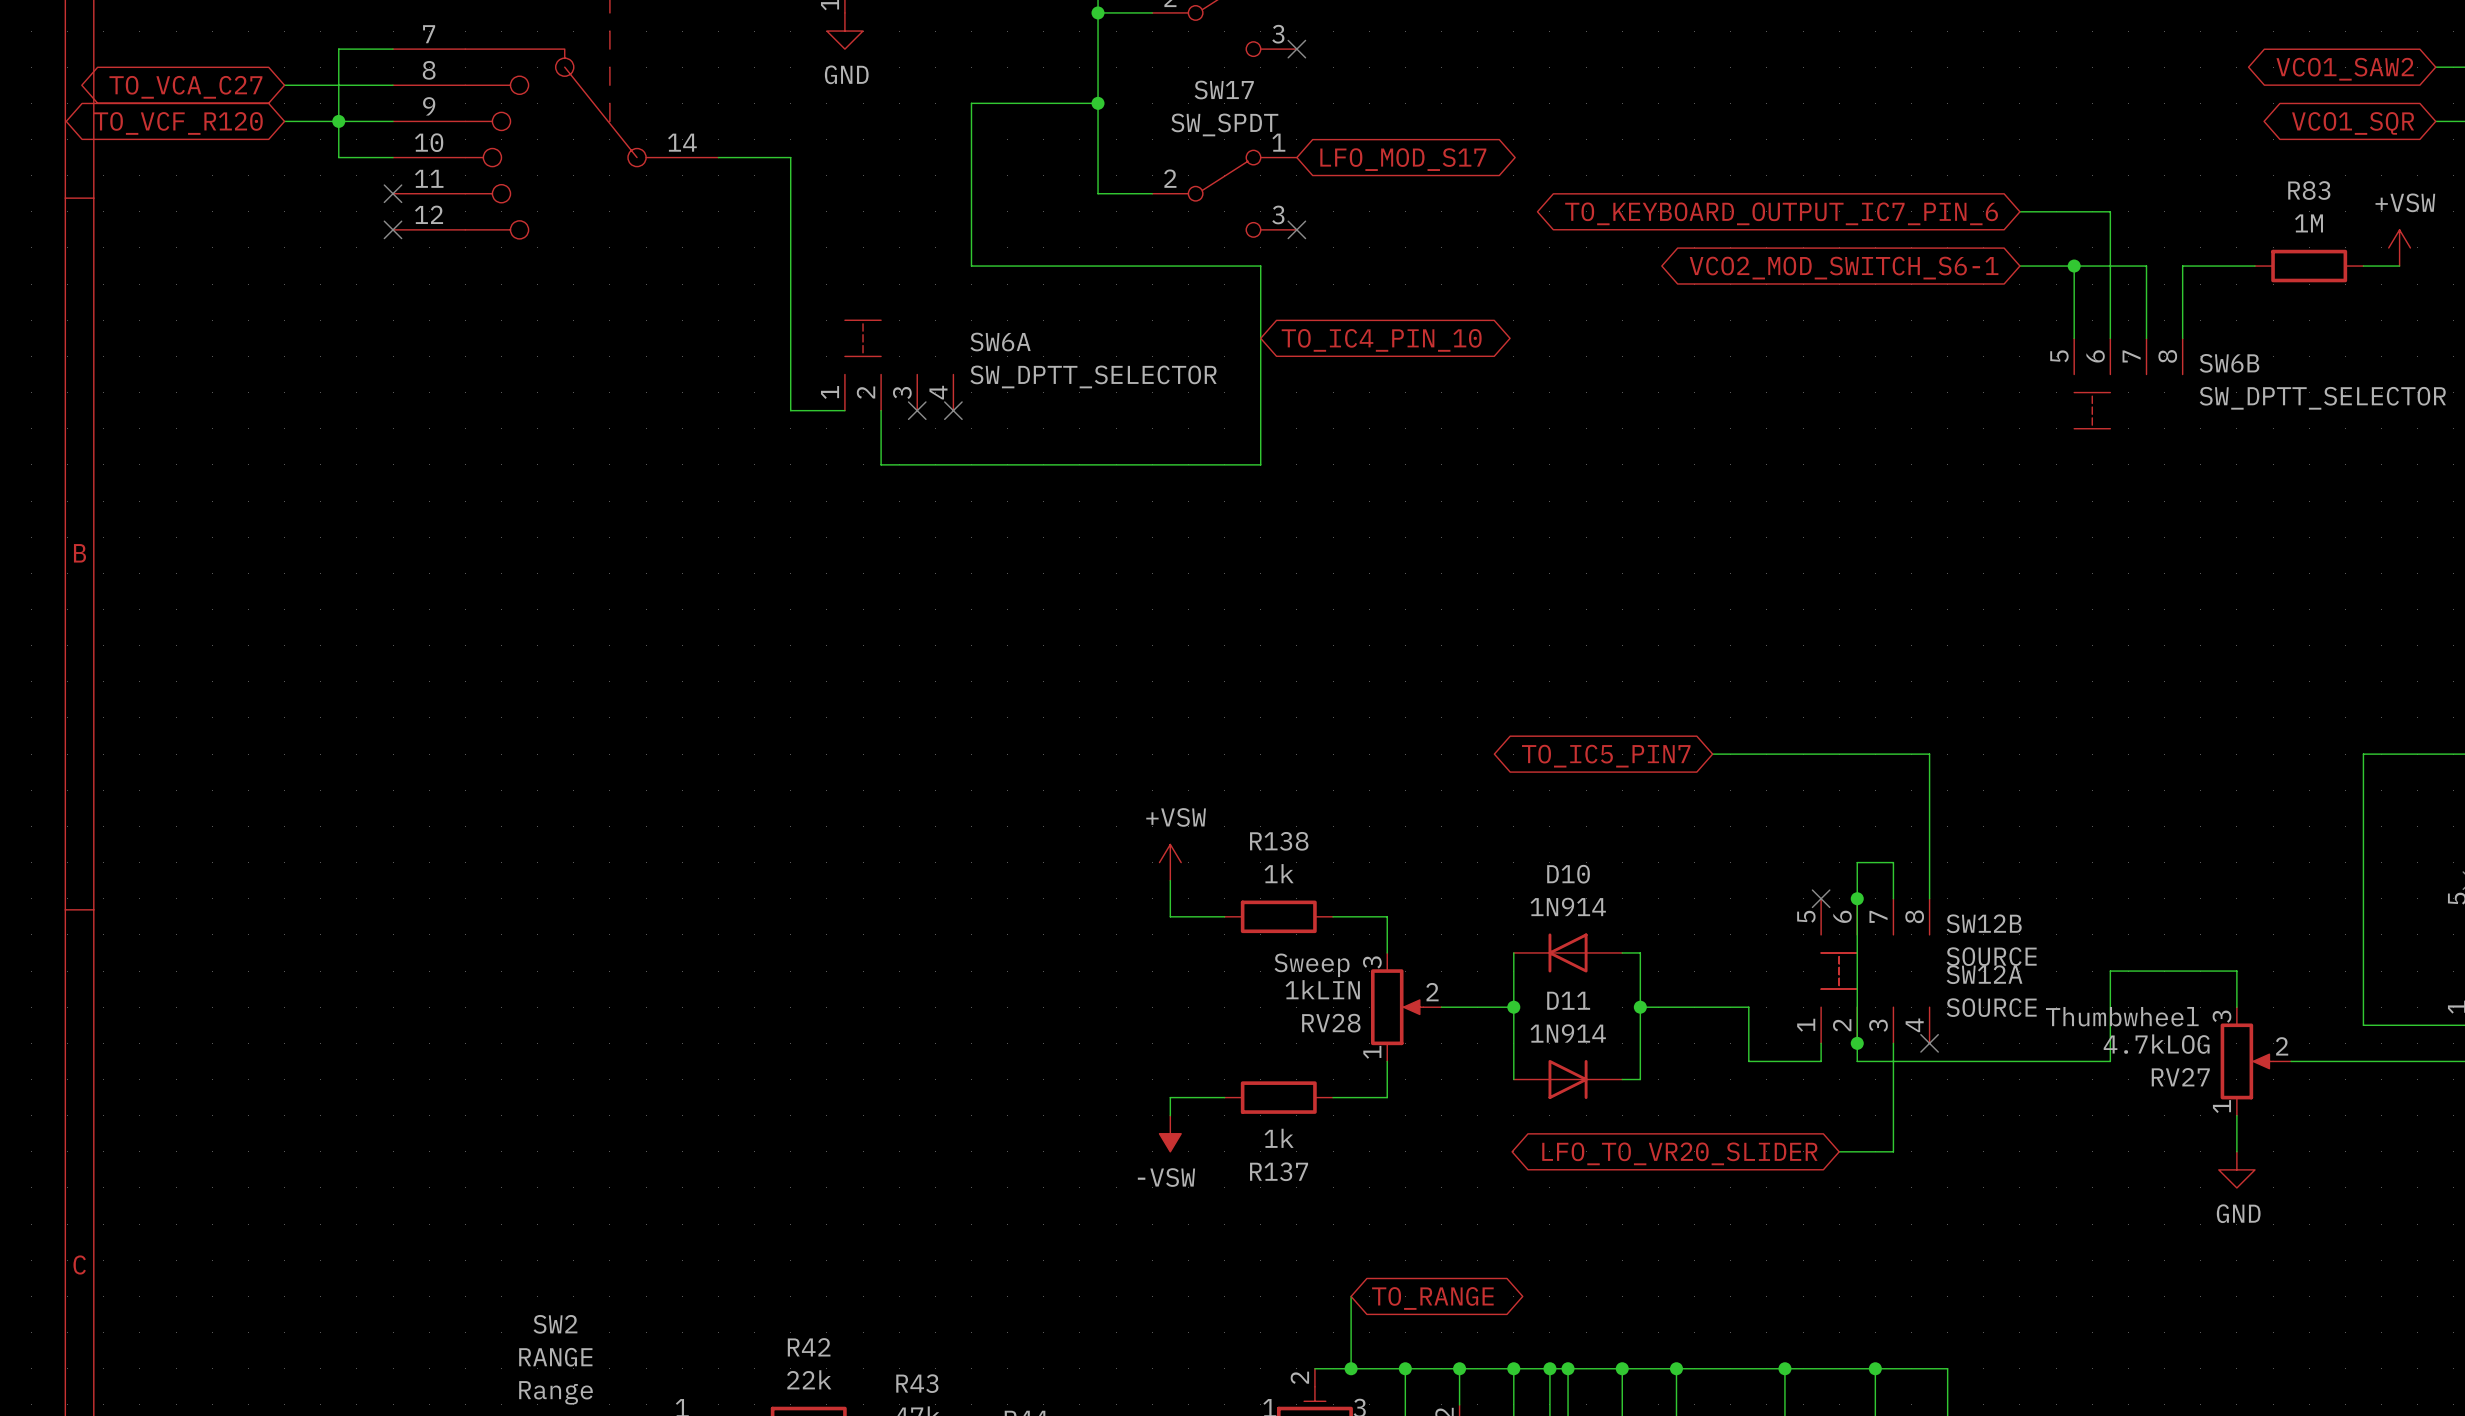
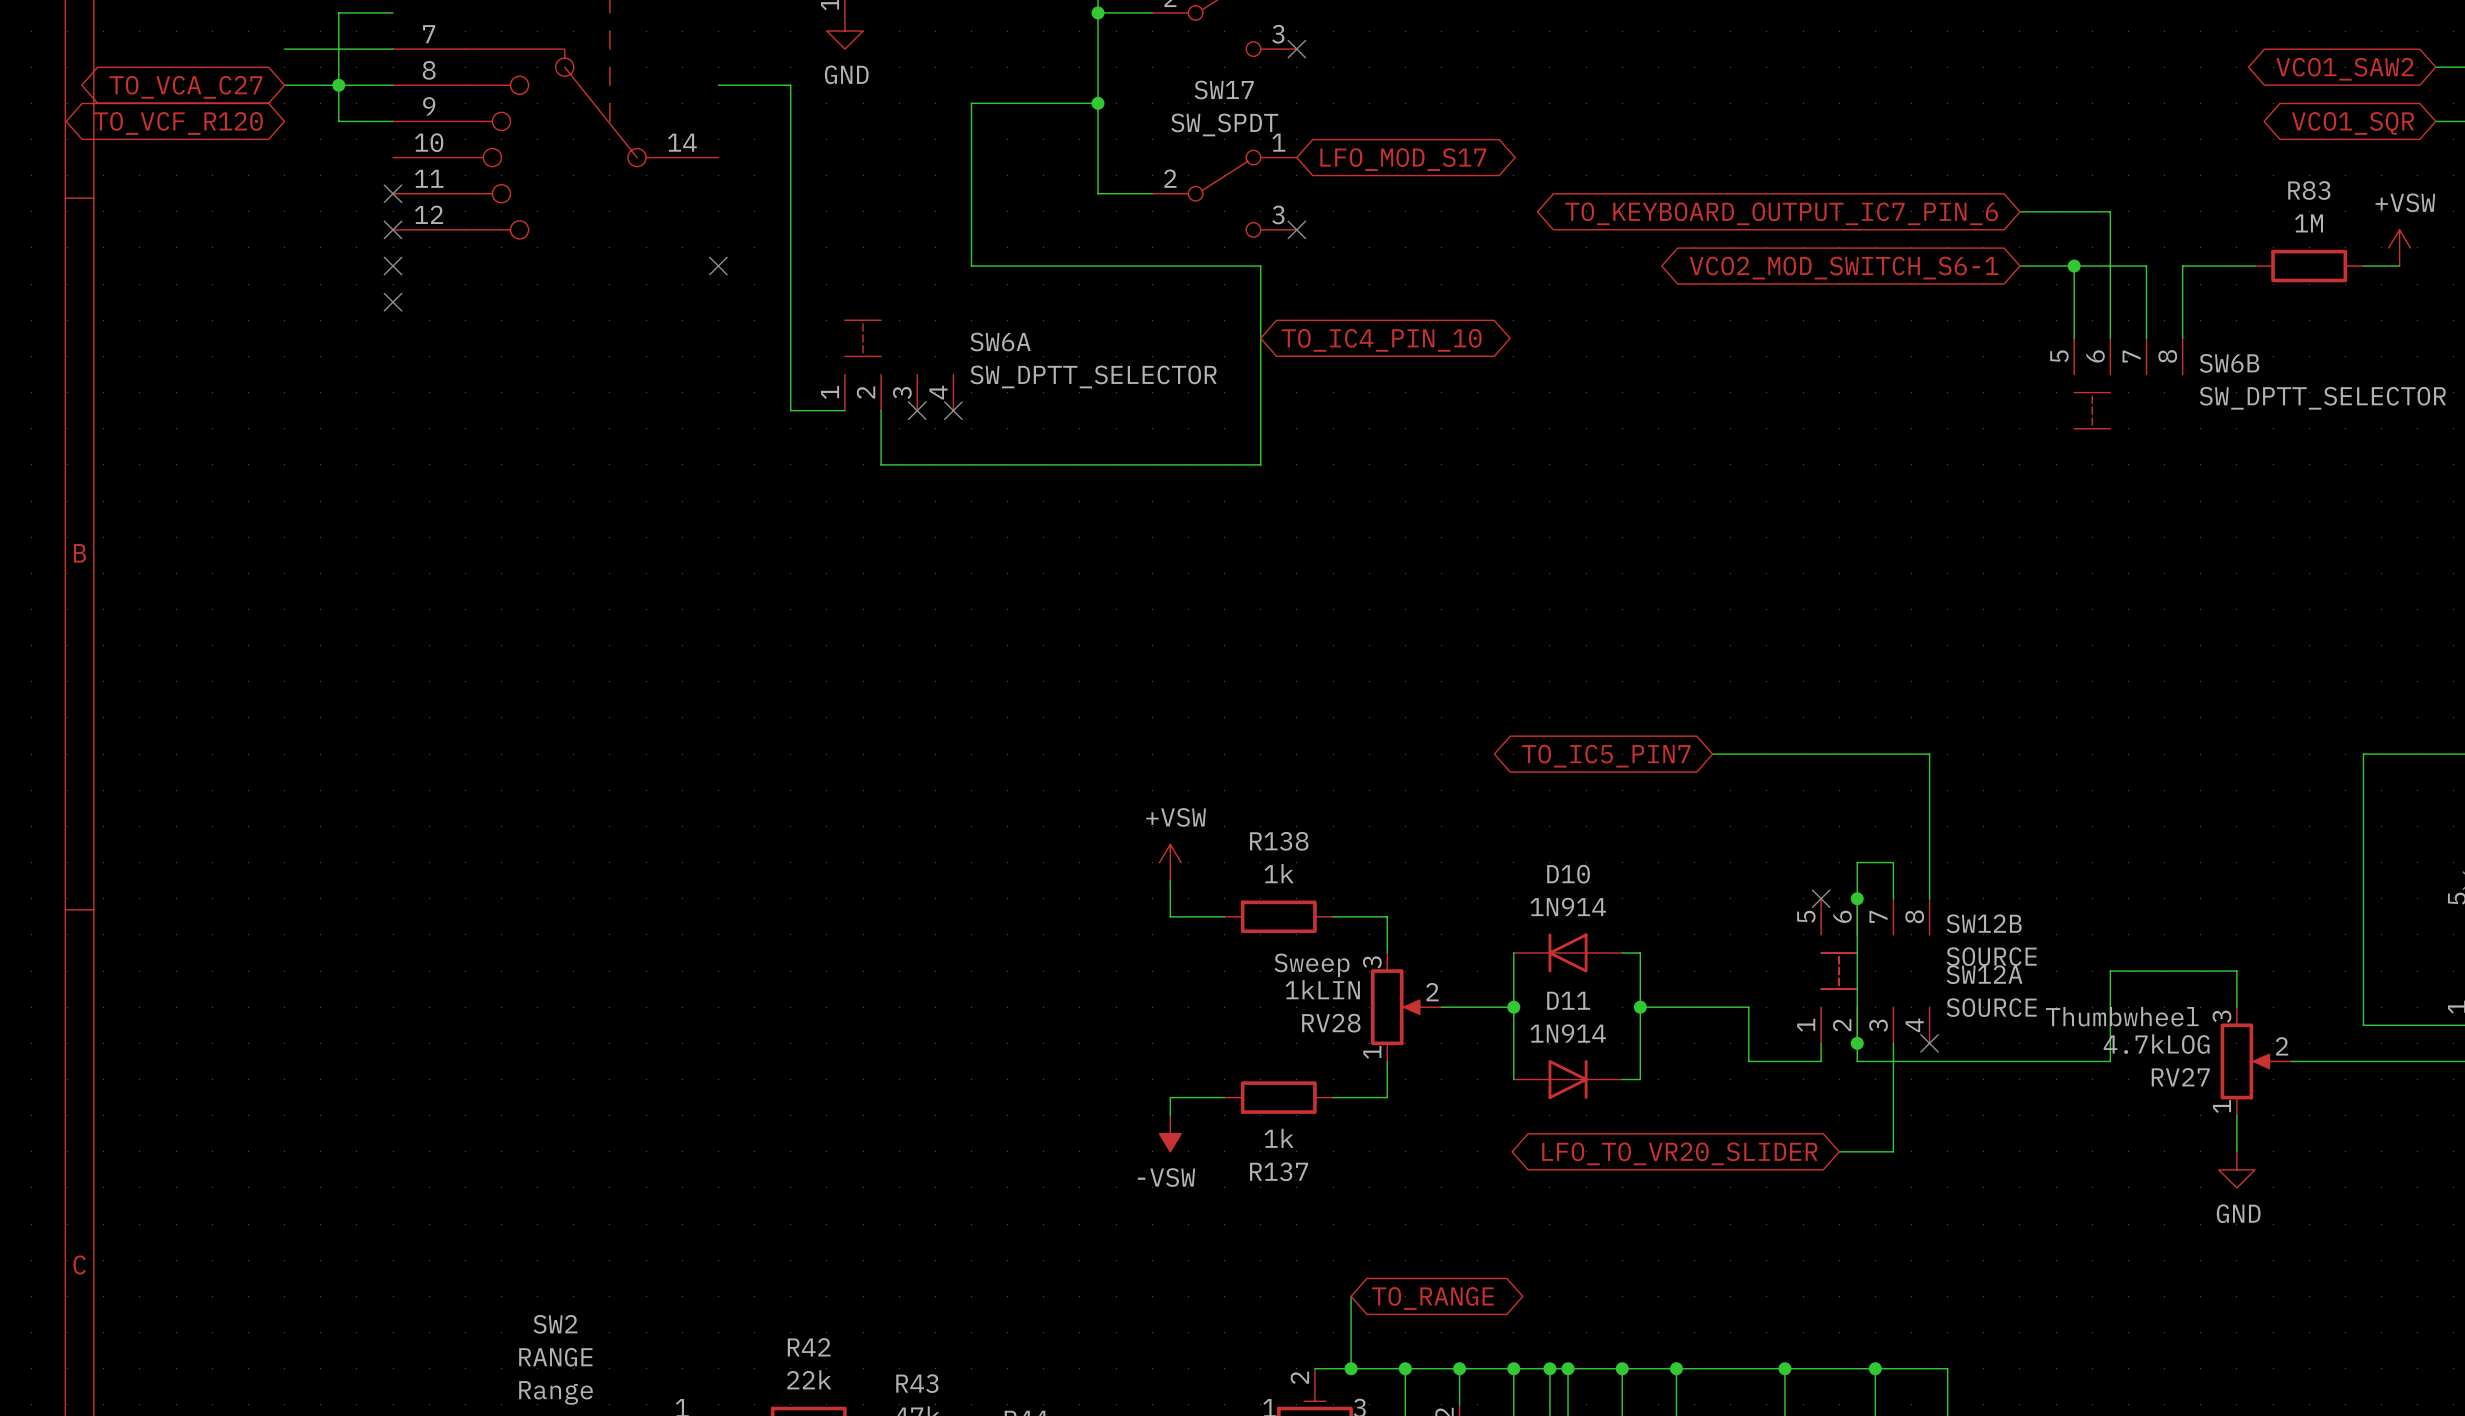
wire: none -> (393, 12) (338, 12) (338, 49) (284, 49)
wire: (284, 121) (338, 121) (338, 157) (393, 157) -> none
junction position: (338, 121) -> (338, 85)
wire: (718, 157) (790, 157) -> (718, 85) (790, 85) (790, 157)
no-connect mark: none -> (393, 266)
no-connect mark: none -> (718, 266)
no-connect mark: none -> (393, 302)

